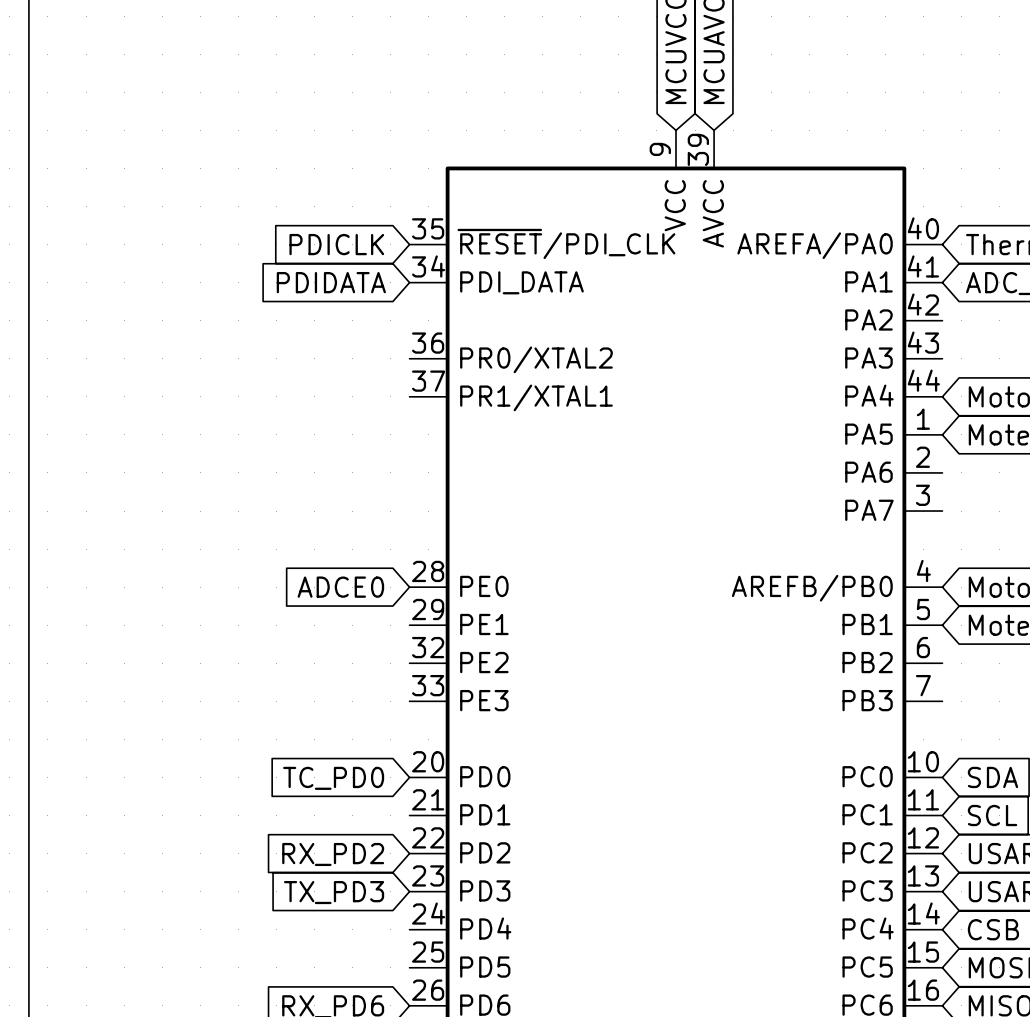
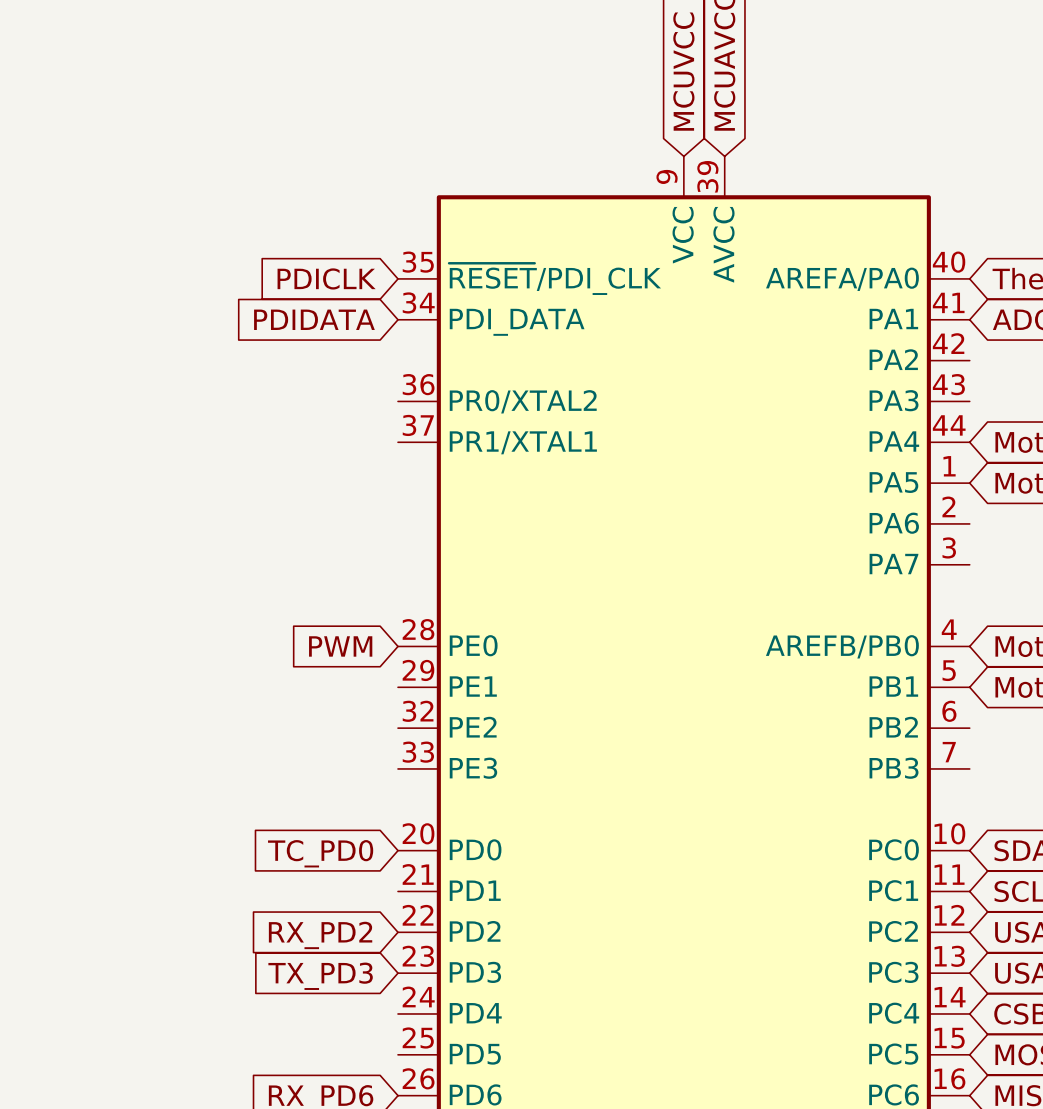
global label: ADCE0 (340, 587) -> PWM (340, 646)

